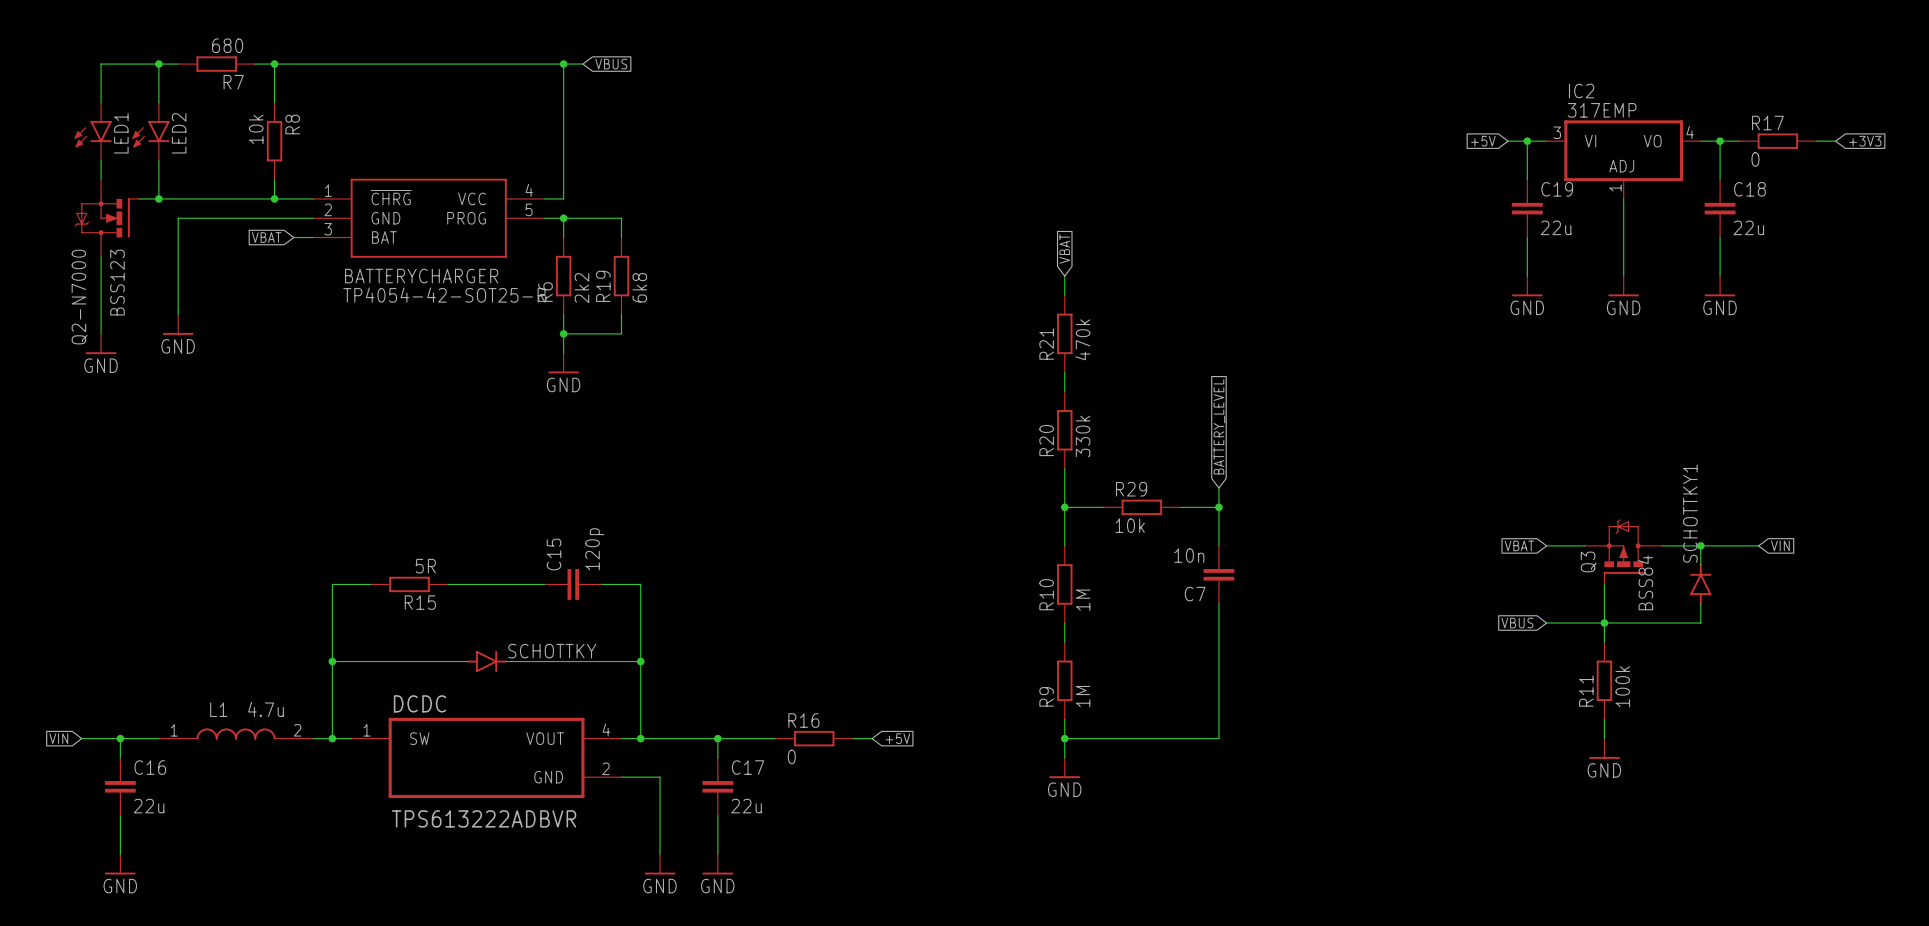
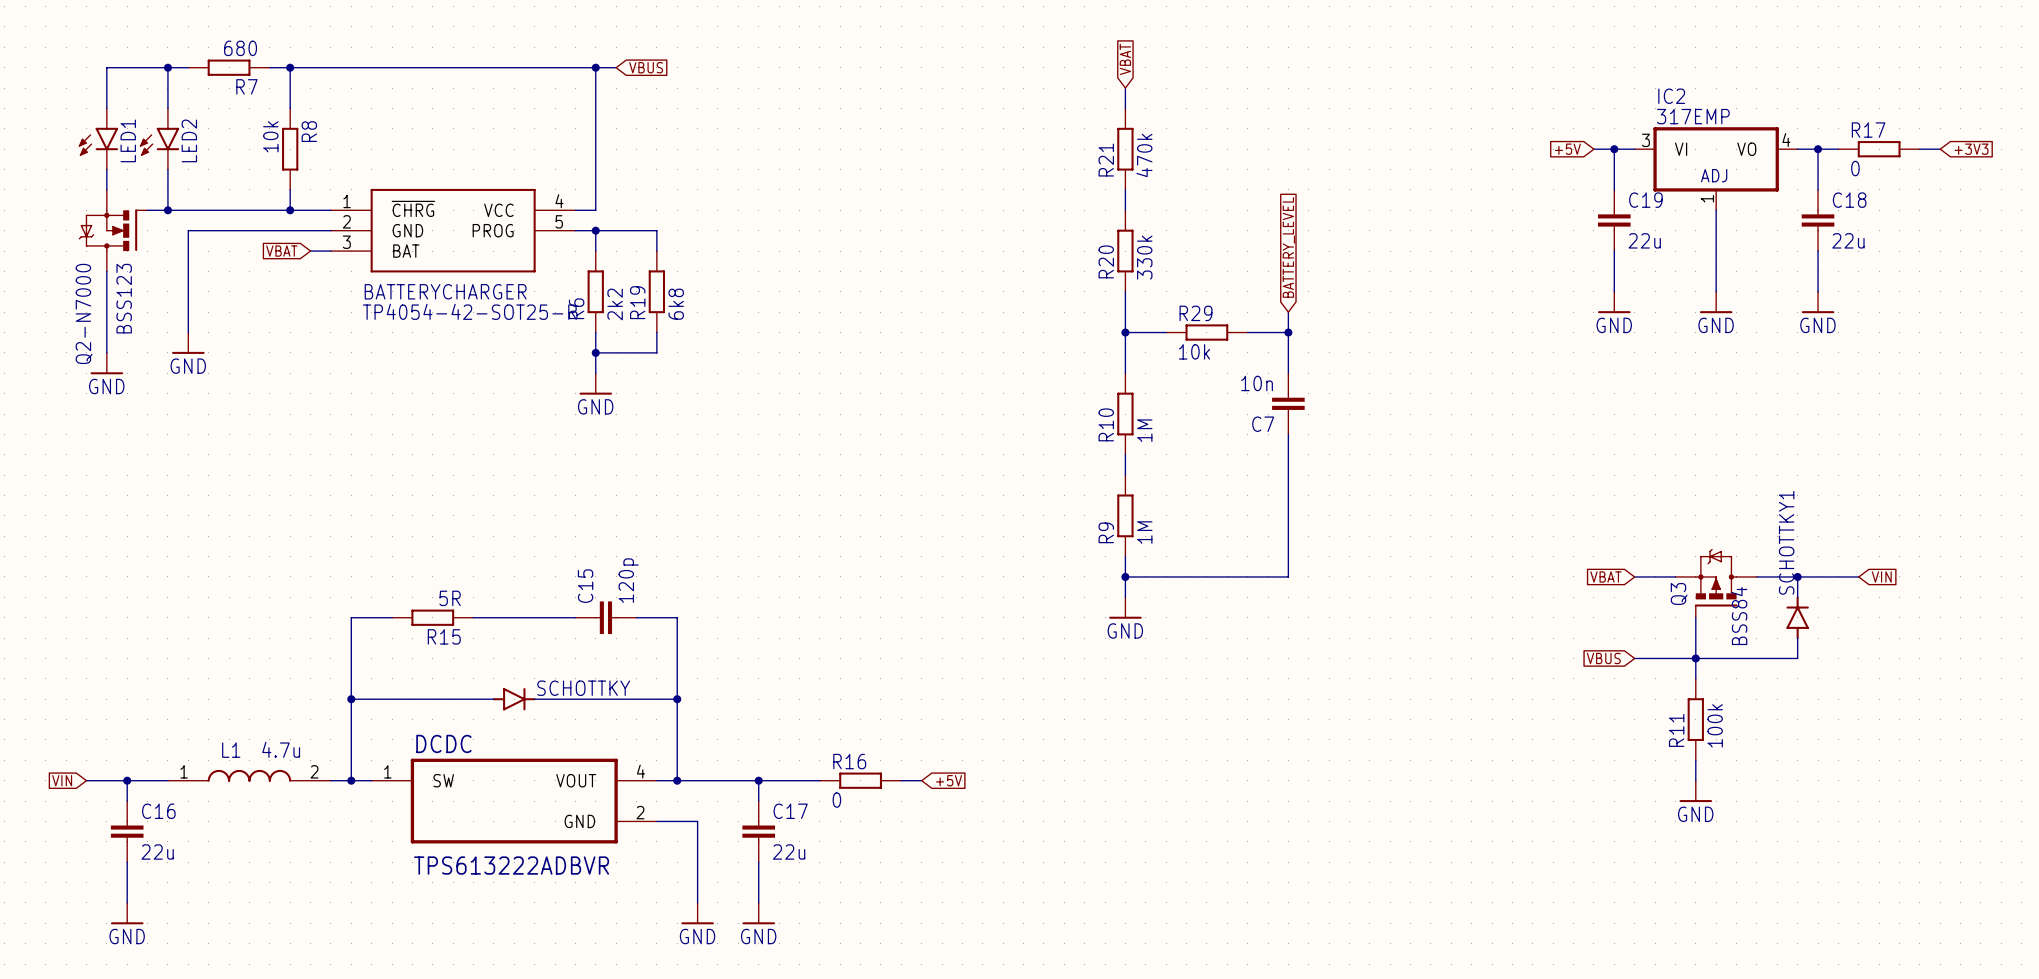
global label: none -> VBAT (1125, 59)
wire: none -> (1125, 88) (1125, 108)
wire: none -> (1125, 189) (1125, 210)
global label: none -> BATTERY_LEVEL (1288, 247)
global label: VBAT (1064, 248) -> none
wire: none -> (1288, 312) (1288, 373)
wire: none -> (1125, 332) (1166, 332)
junction: none -> (1125, 332)
wire: none -> (1247, 332) (1288, 332)
junction: none -> (1288, 332)
R21 position: (1064, 333) -> (1125, 149)
wire: (1064, 372) (1064, 391) -> (1125, 454) (1125, 475)
wire: none -> (1288, 434) (1288, 515)
global label: BATTERY_LEVEL (1219, 426) -> none
R20 position: (1064, 430) -> (1125, 251)
wire: (1064, 468) (1064, 526) -> (1125, 312) (1125, 373)
wire: (1064, 507) (1103, 507) -> none
junction position: (1064, 507) -> (1125, 576)
R29 position: (1141, 507) -> (1206, 332)
wire: (1180, 507) (1218, 507) -> none
junction: (1218, 507) -> none
wire: none -> (1288, 576) (1125, 576) (1125, 597)
C7 position: (1218, 574) -> (1288, 403)
power symbol: none -> GND (1125, 608)
R10 position: (1064, 584) -> (1125, 414)
wire: (1218, 603) (1218, 738) (1064, 738) -> none
wire: (1064, 622) (1064, 642) -> none
R9 position: (1064, 680) -> (1125, 515)
wire: (1064, 719) (1064, 757) -> none
junction: (1064, 738) -> none
power symbol: GND (1064, 768) -> none

